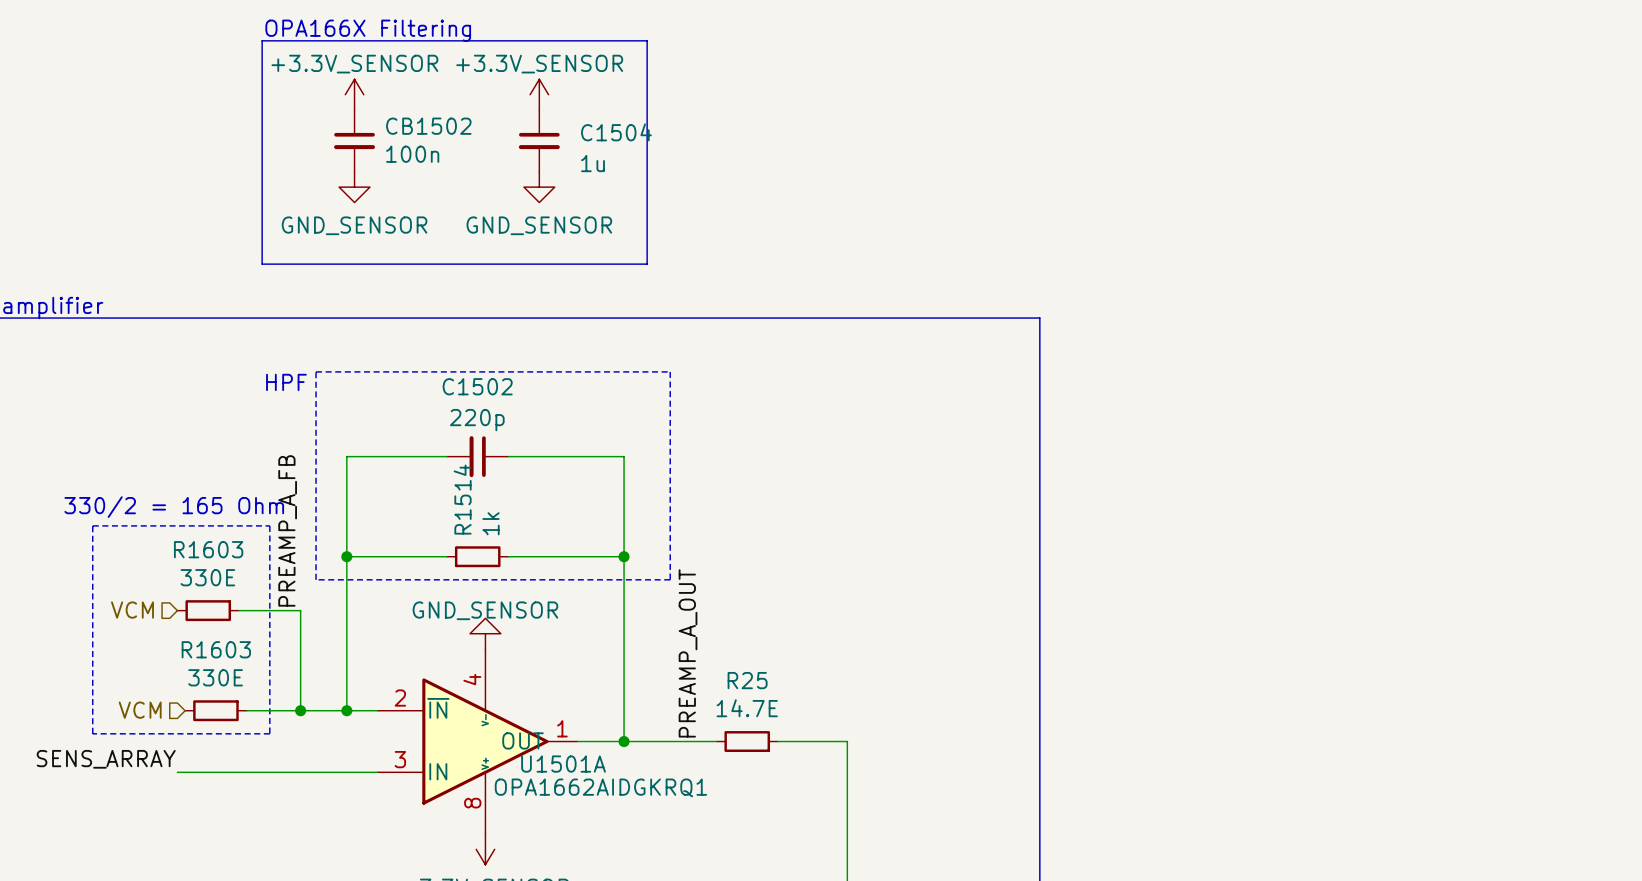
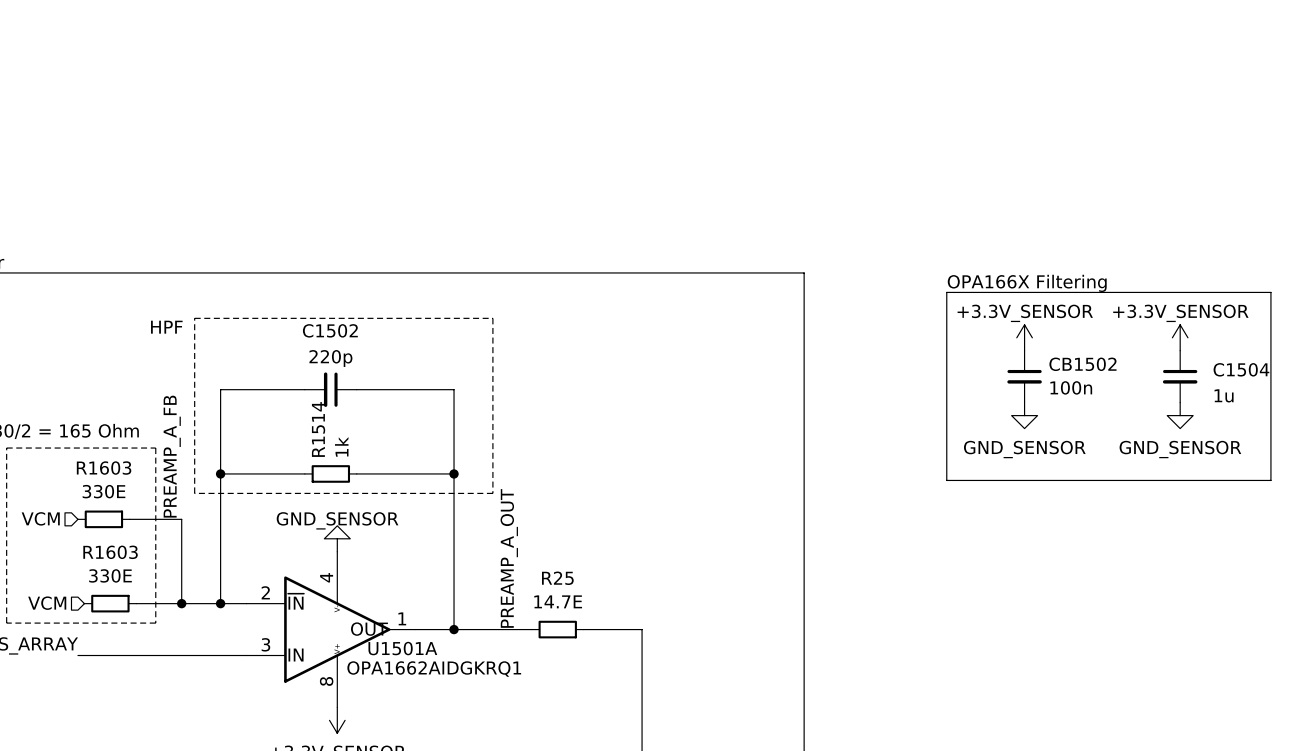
text: OPA166X Filtering (368, 30) -> none
line: (262, 40) (647, 40) (647, 264) (262, 264) (262, 40) -> none
power symbol: +3.3V_SENSOR (354, 94) -> none
power symbol: +3.3V_SENSOR (539, 94) -> none
CB1502 position: (354, 140) -> (1024, 376)
C1504 position: (539, 140) -> (1180, 376)
power symbol: GND_SENSOR (354, 187) -> none
power symbol: GND_SENSOR (539, 187) -> none
text: none -> OPA166X Filtering (1027, 283)
line: none -> (946, 292) (1270, 292) (1270, 480) (946, 480) (946, 292)
power symbol: none -> +3.3V_SENSOR (1024, 337)
power symbol: none -> +3.3V_SENSOR (1180, 337)
power symbol: none -> GND_SENSOR (1024, 415)
power symbol: none -> GND_SENSOR (1180, 415)

